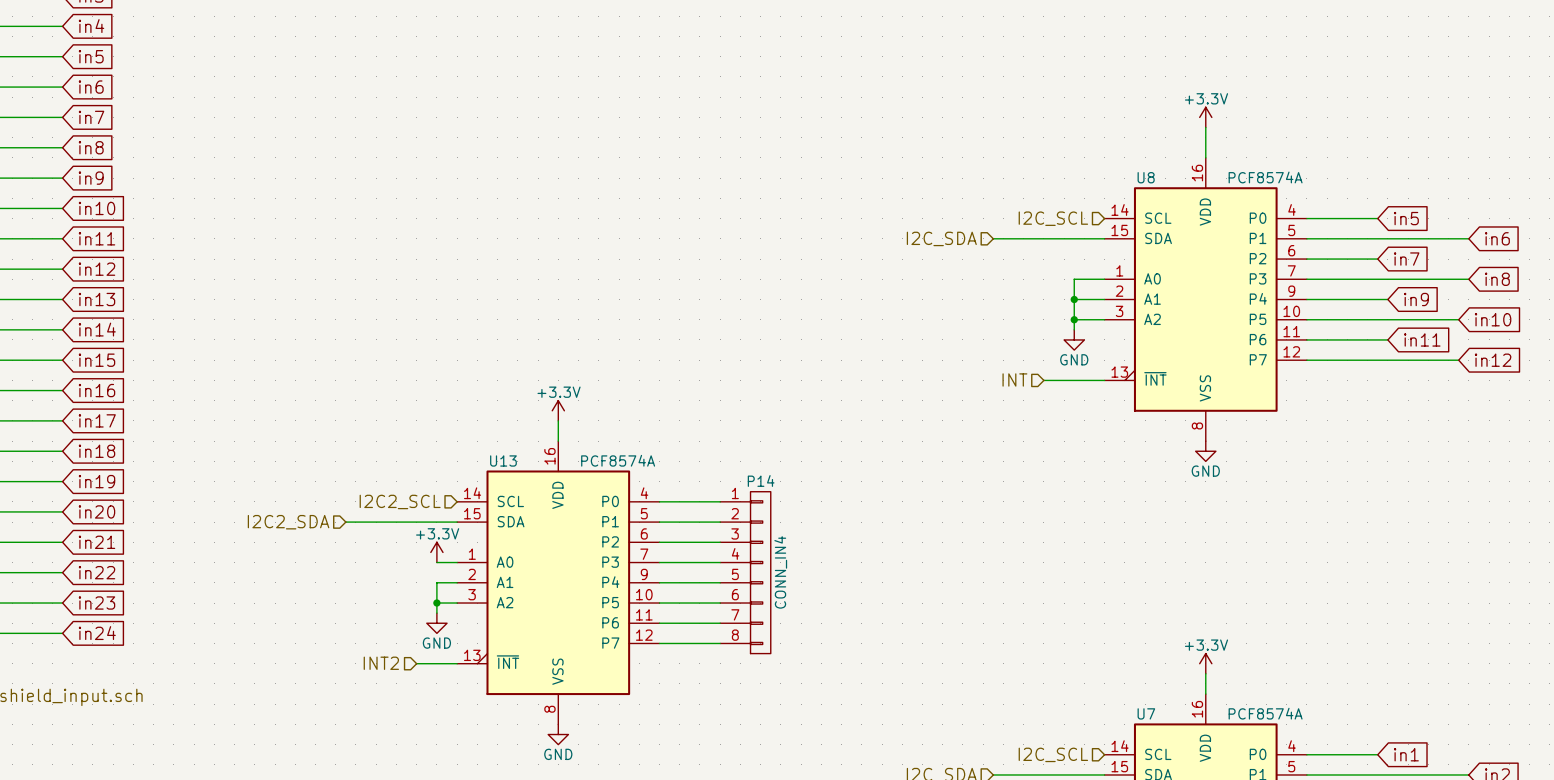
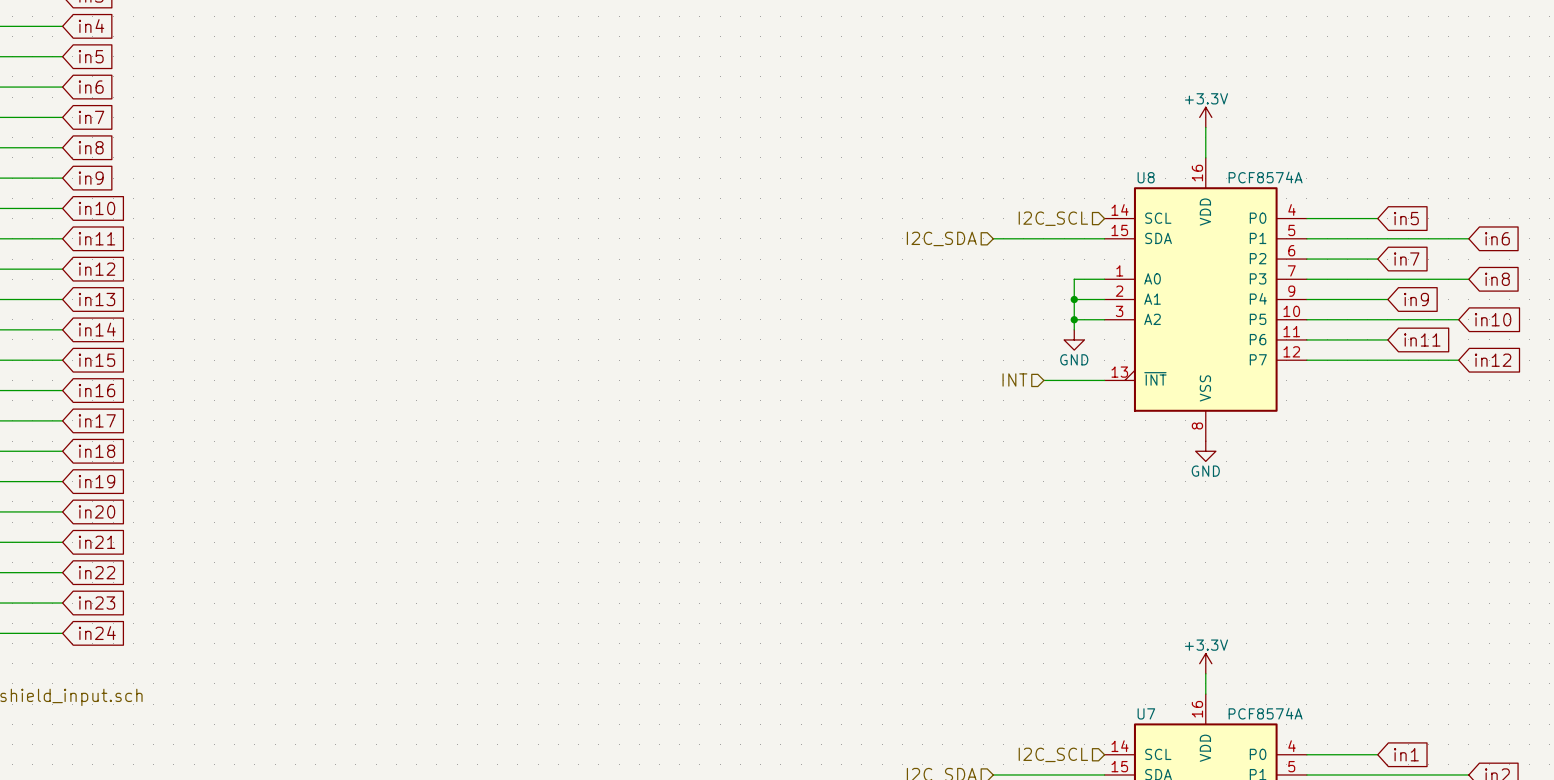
power symbol: +3.3V (558, 410) -> none
wire: (558, 420) (558, 441) -> none
hierarchical label: I2C2_SCL (400, 501) -> none
wire: (659, 501) (720, 501) -> none
hierarchical label: I2C2_SDA (288, 522) -> none
wire: (345, 522) (457, 522) -> none
wire: (659, 522) (720, 522) -> none
wire: (659, 542) (720, 542) -> none
power symbol: +3.3V (436, 552) -> none
wire: (436, 562) (457, 562) -> none
wire: (659, 562) (720, 562) -> none
P14: CONN_IN4 (745, 572) -> none
wire: (457, 582) (436, 582) (436, 613) -> none
U13: PCF8574A (558, 582) -> none
wire: (659, 582) (720, 582) -> none
wire: (436, 603) (457, 603) -> none
junction: (436, 603) -> none
wire: (659, 603) (720, 603) -> none
power symbol: GND (436, 623) -> none
wire: (659, 623) (720, 623) -> none
wire: (659, 643) (720, 643) -> none
hierarchical label: INT2 (381, 663) -> none
wire: (416, 663) (457, 663) -> none
power symbol: GND (558, 734) -> none

